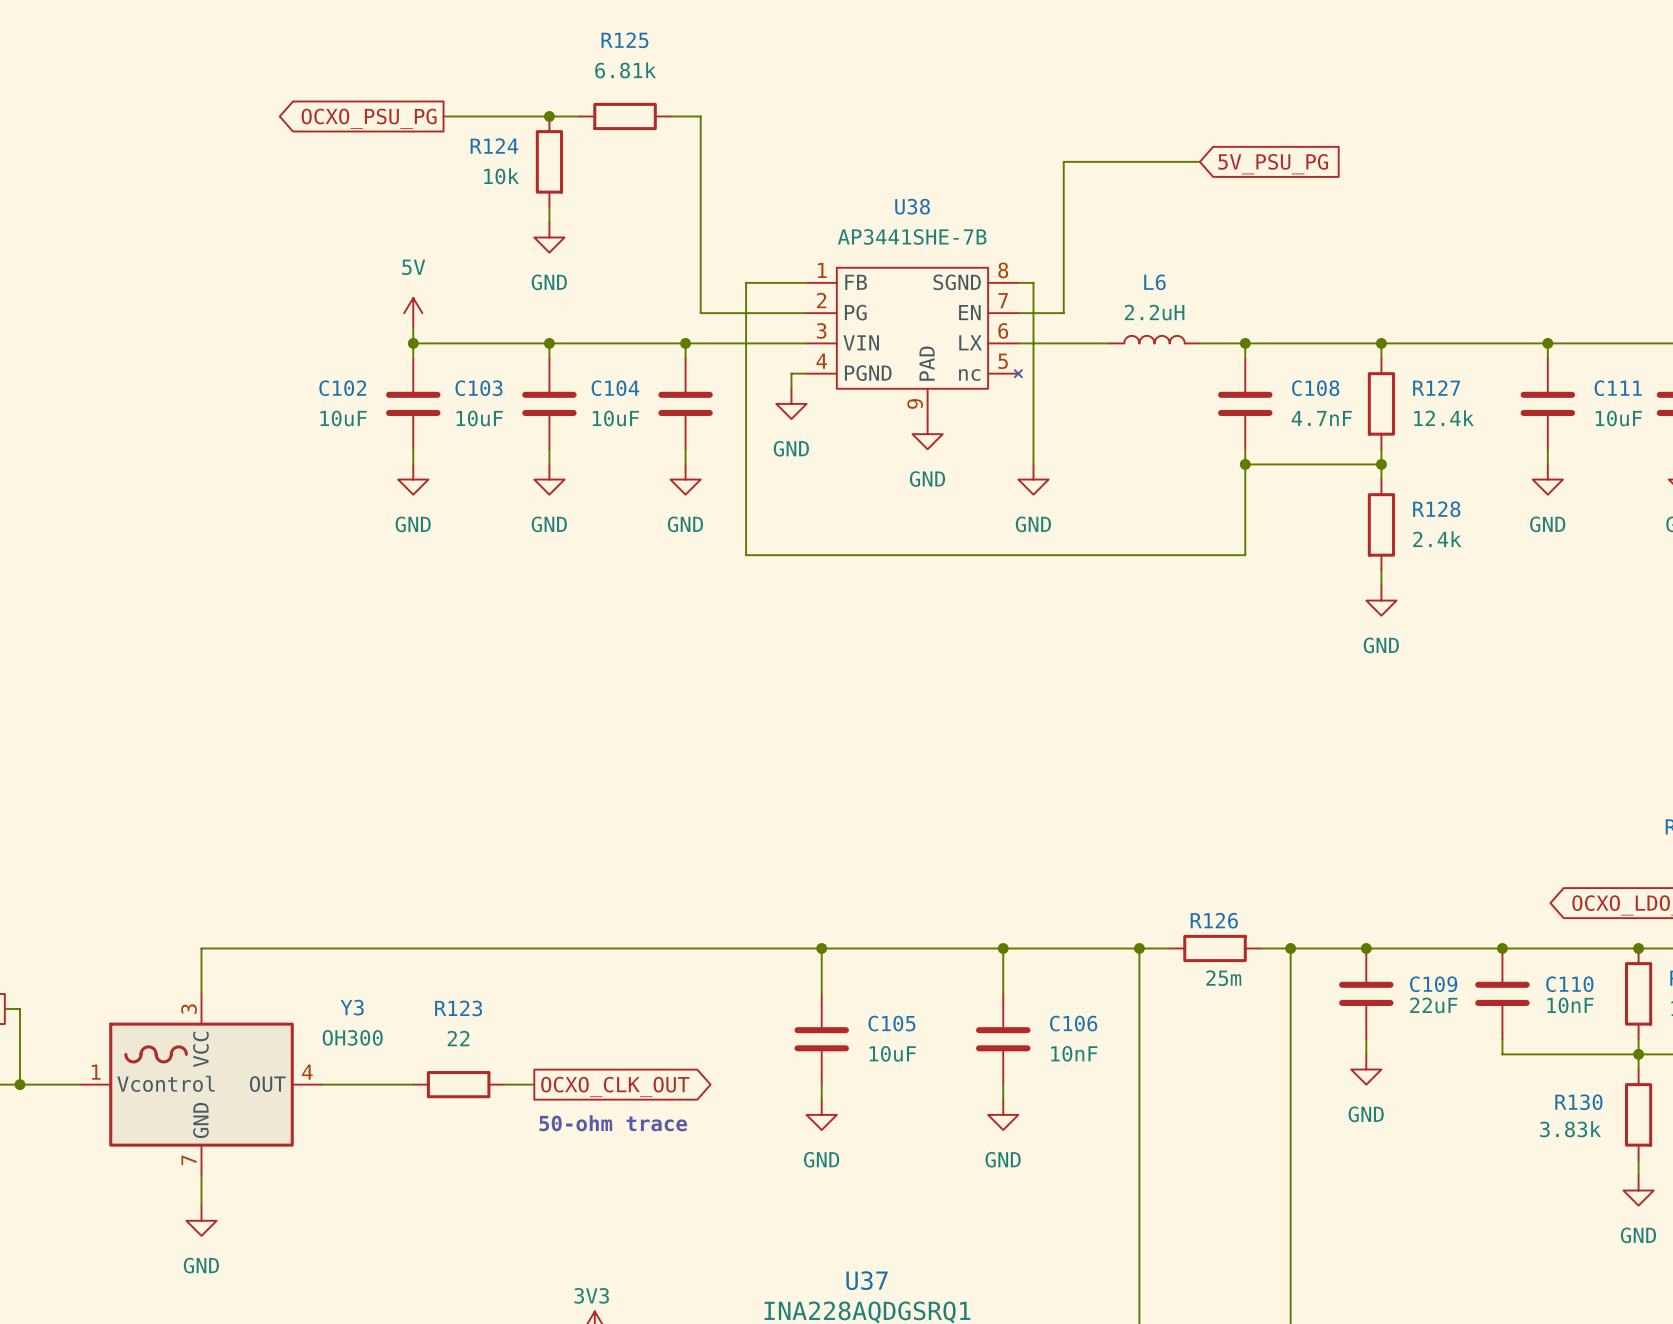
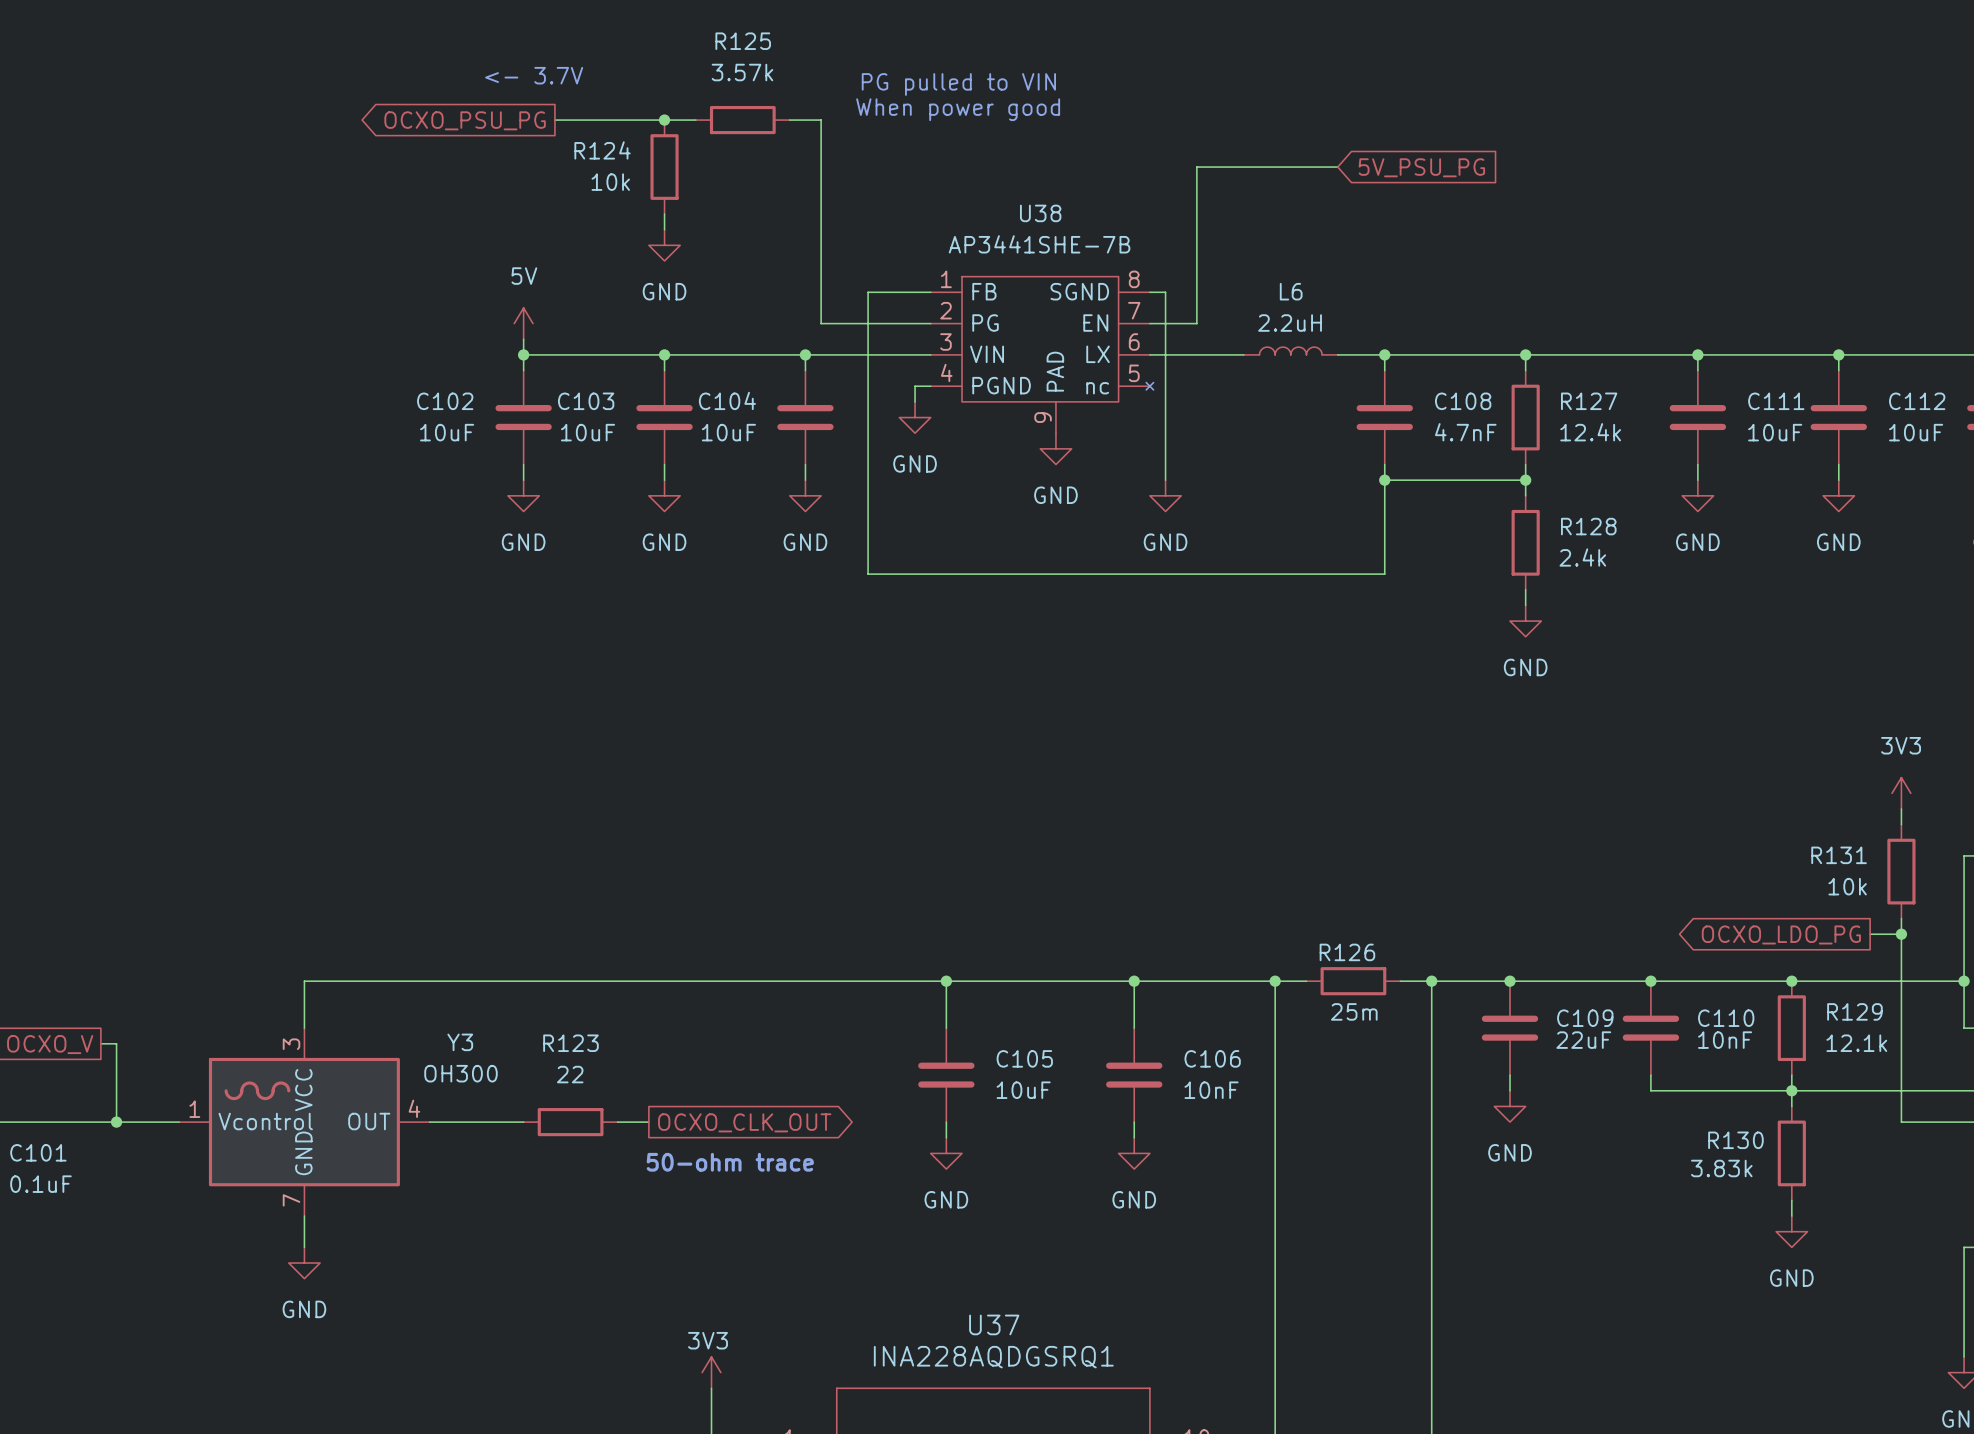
R125 value: 6.81k (625, 70) -> 3.57k (742, 72)
text: none -> <- 3.7V (534, 75)
text: none -> PG pulled to VIN (958, 84)
text: none -> When power good (958, 109)

